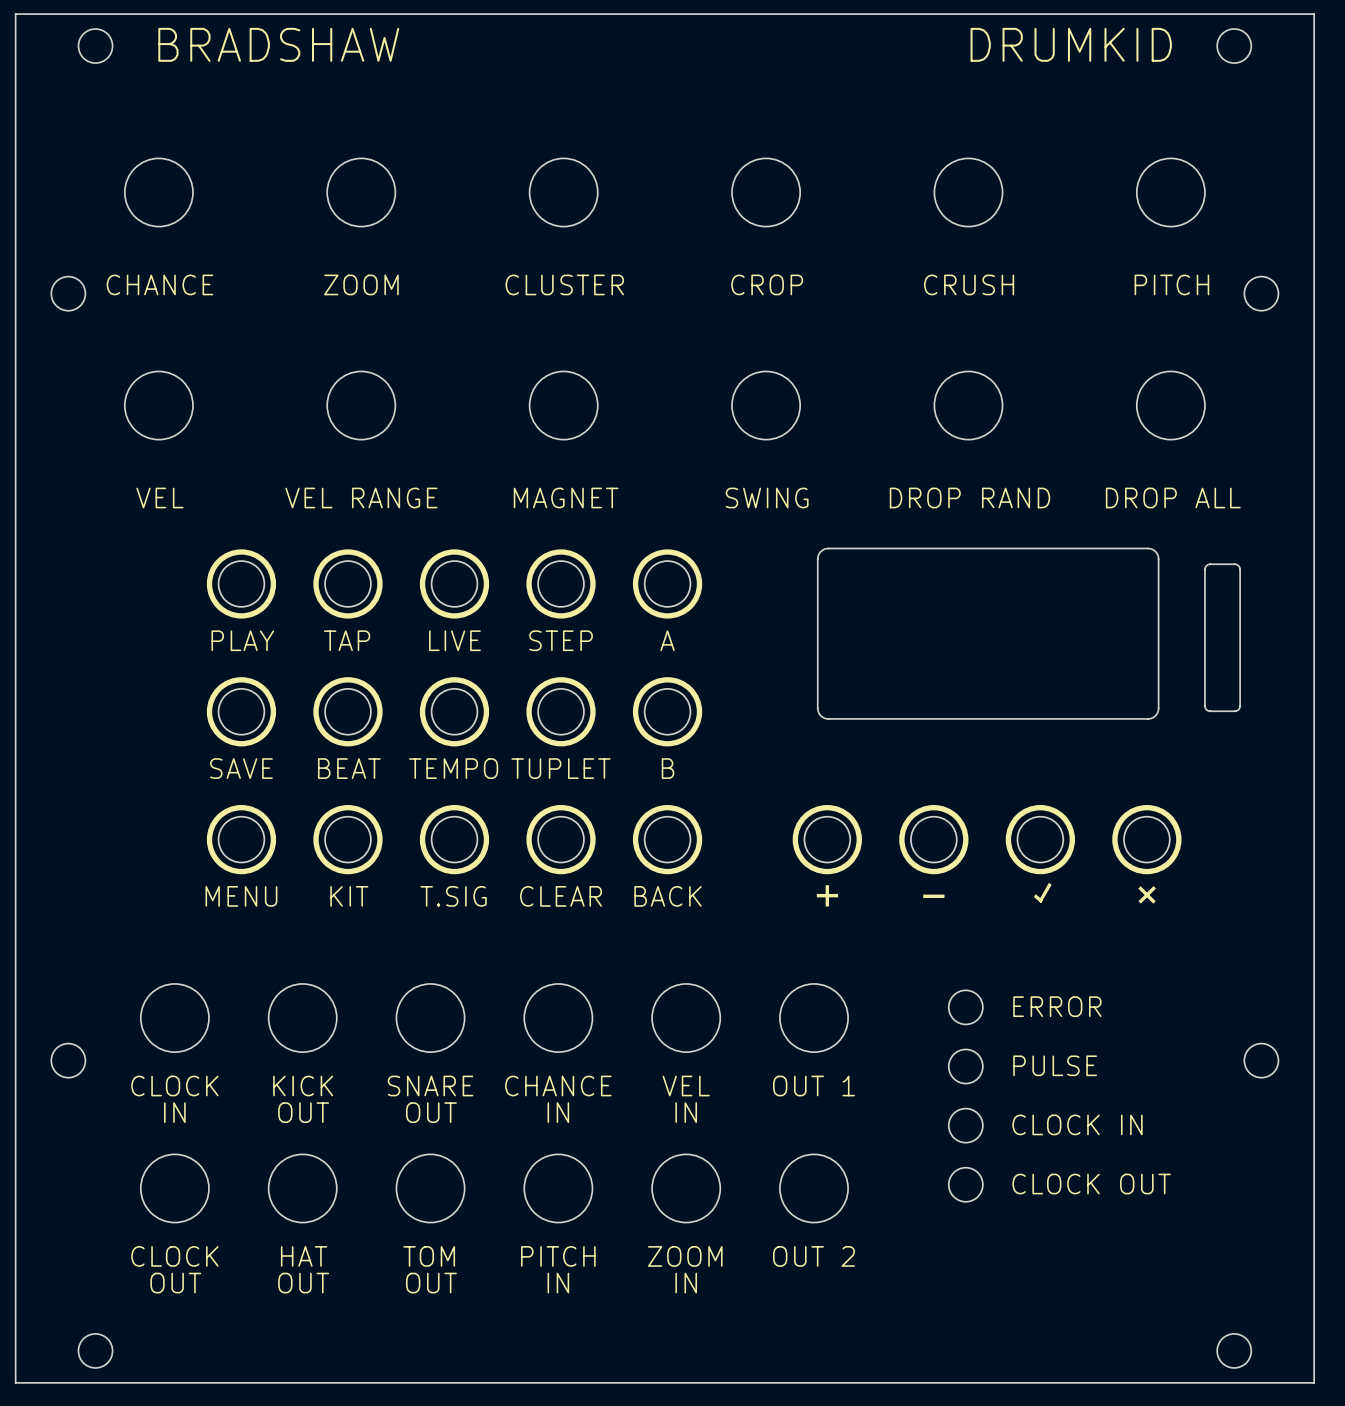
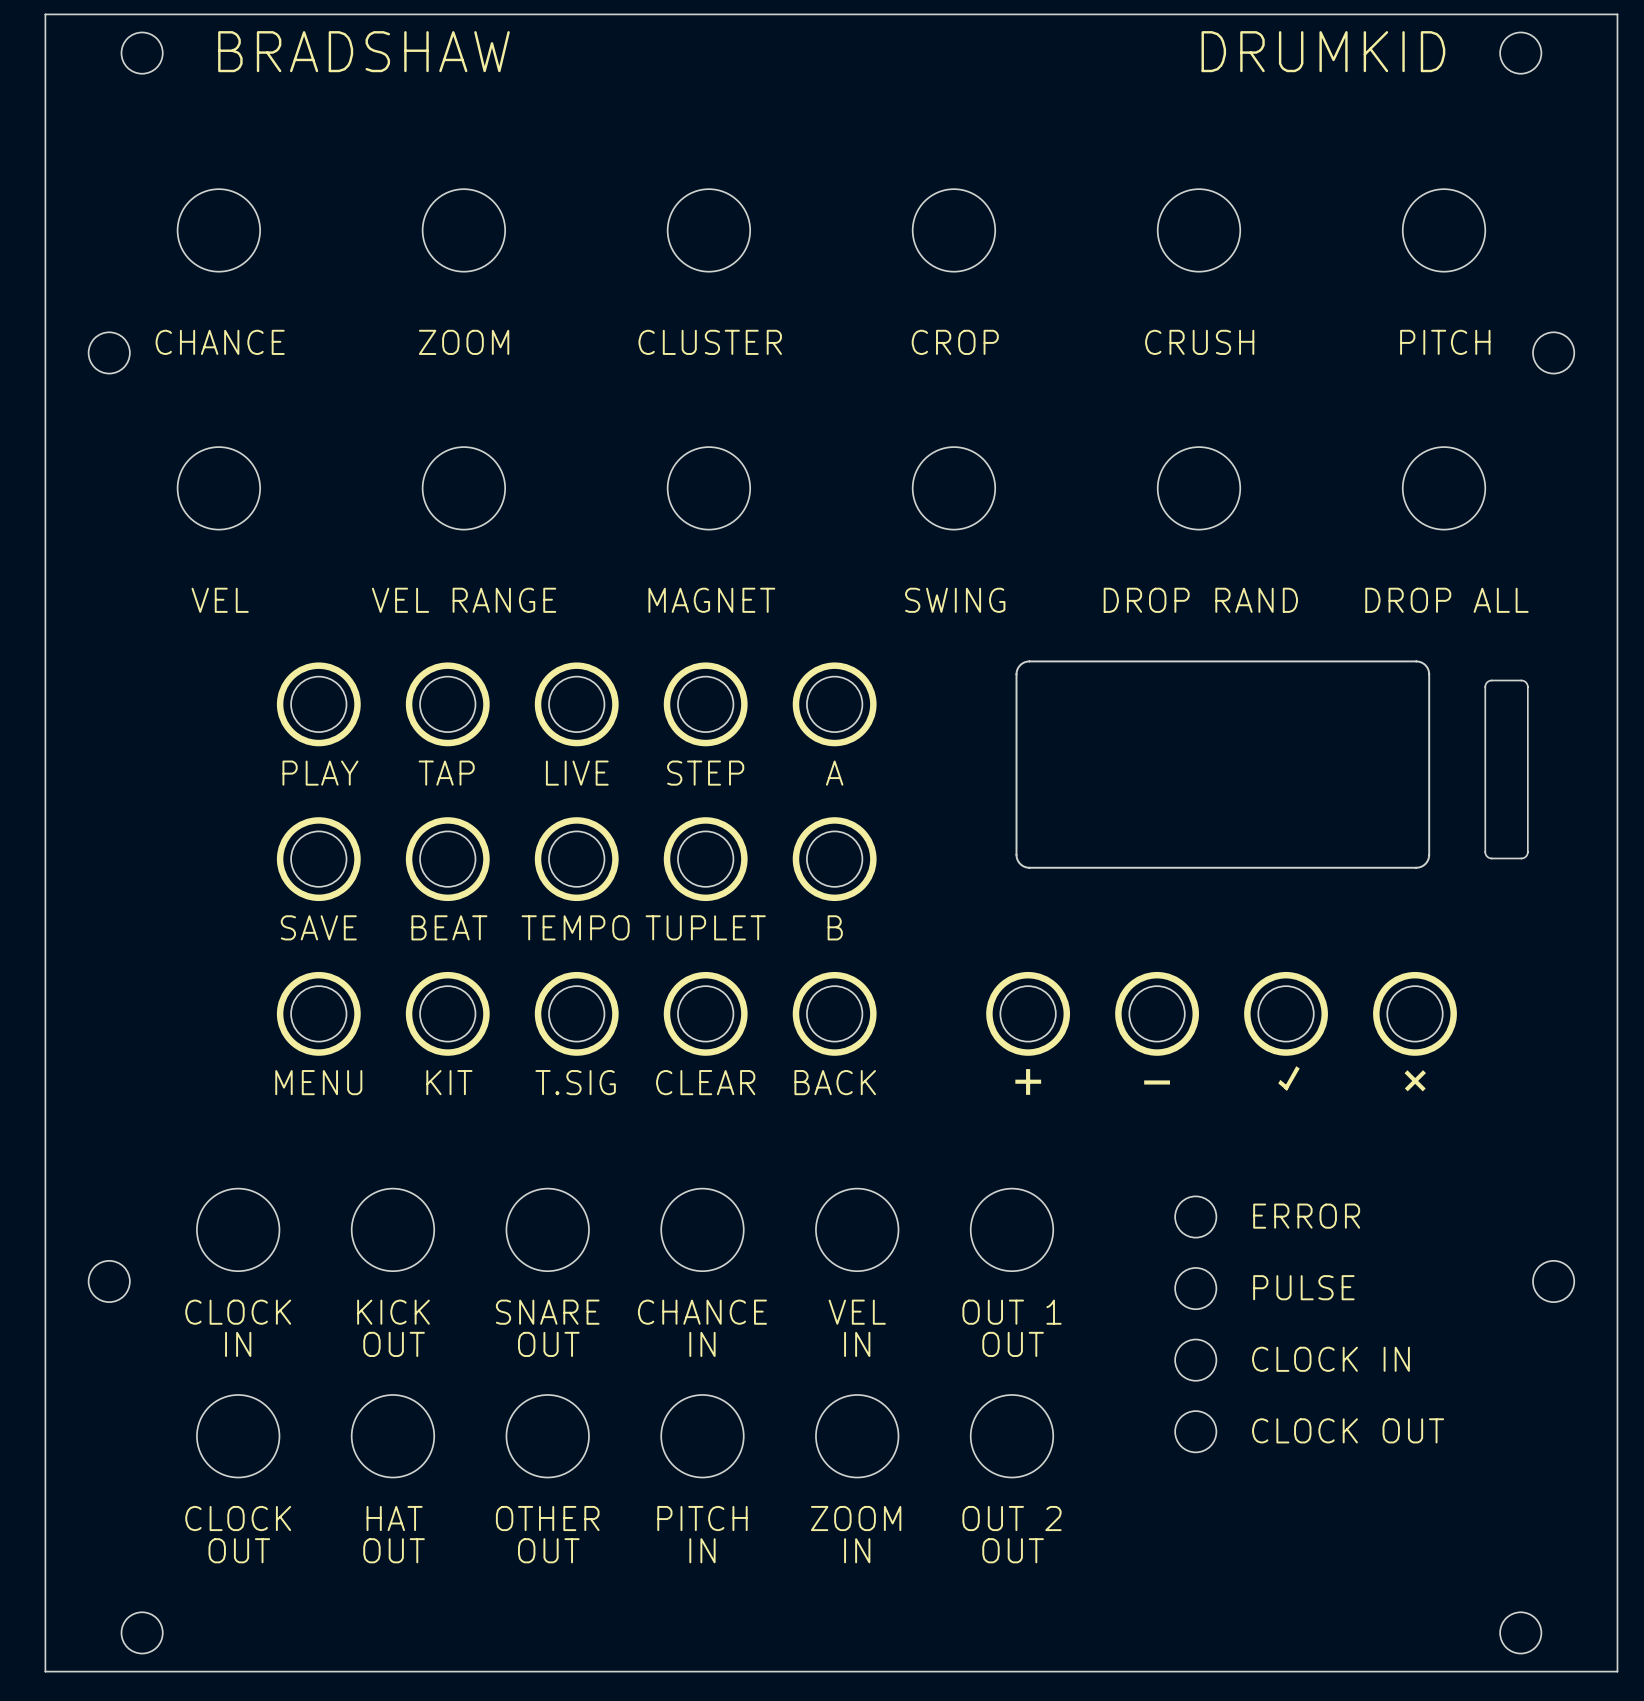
part text: none -> OUT (1013, 1344)
part value: TOM (429, 1256) -> OTHER (547, 1518)
part text: none -> OUT (1013, 1550)

